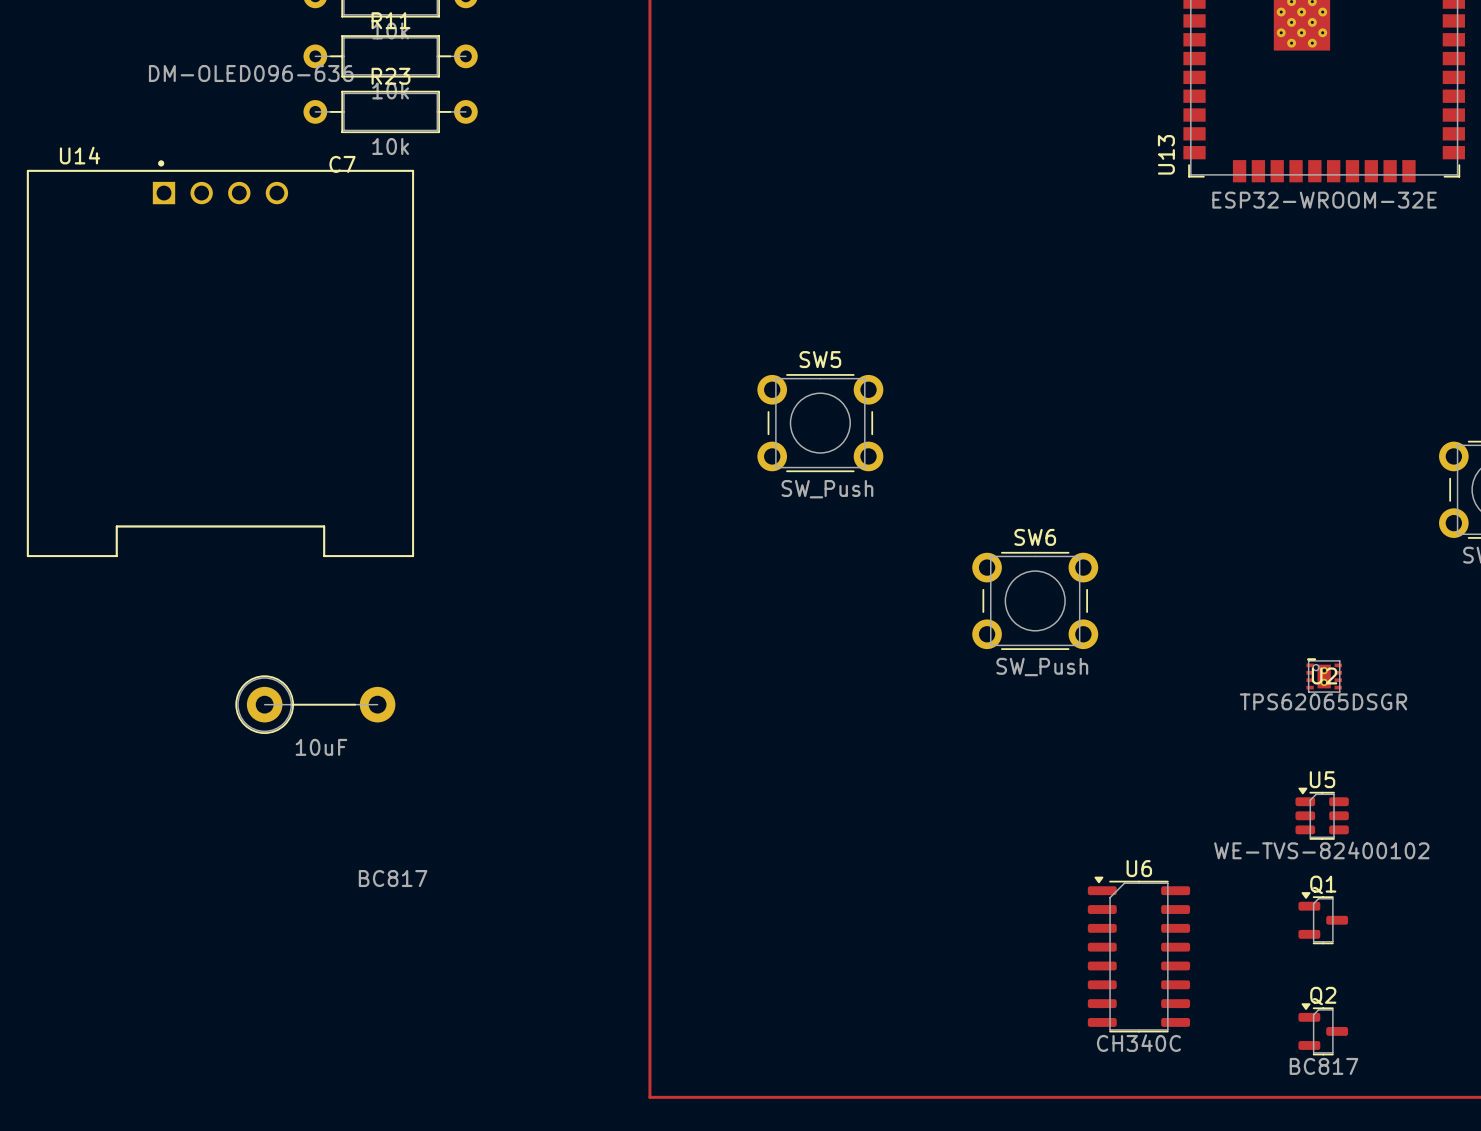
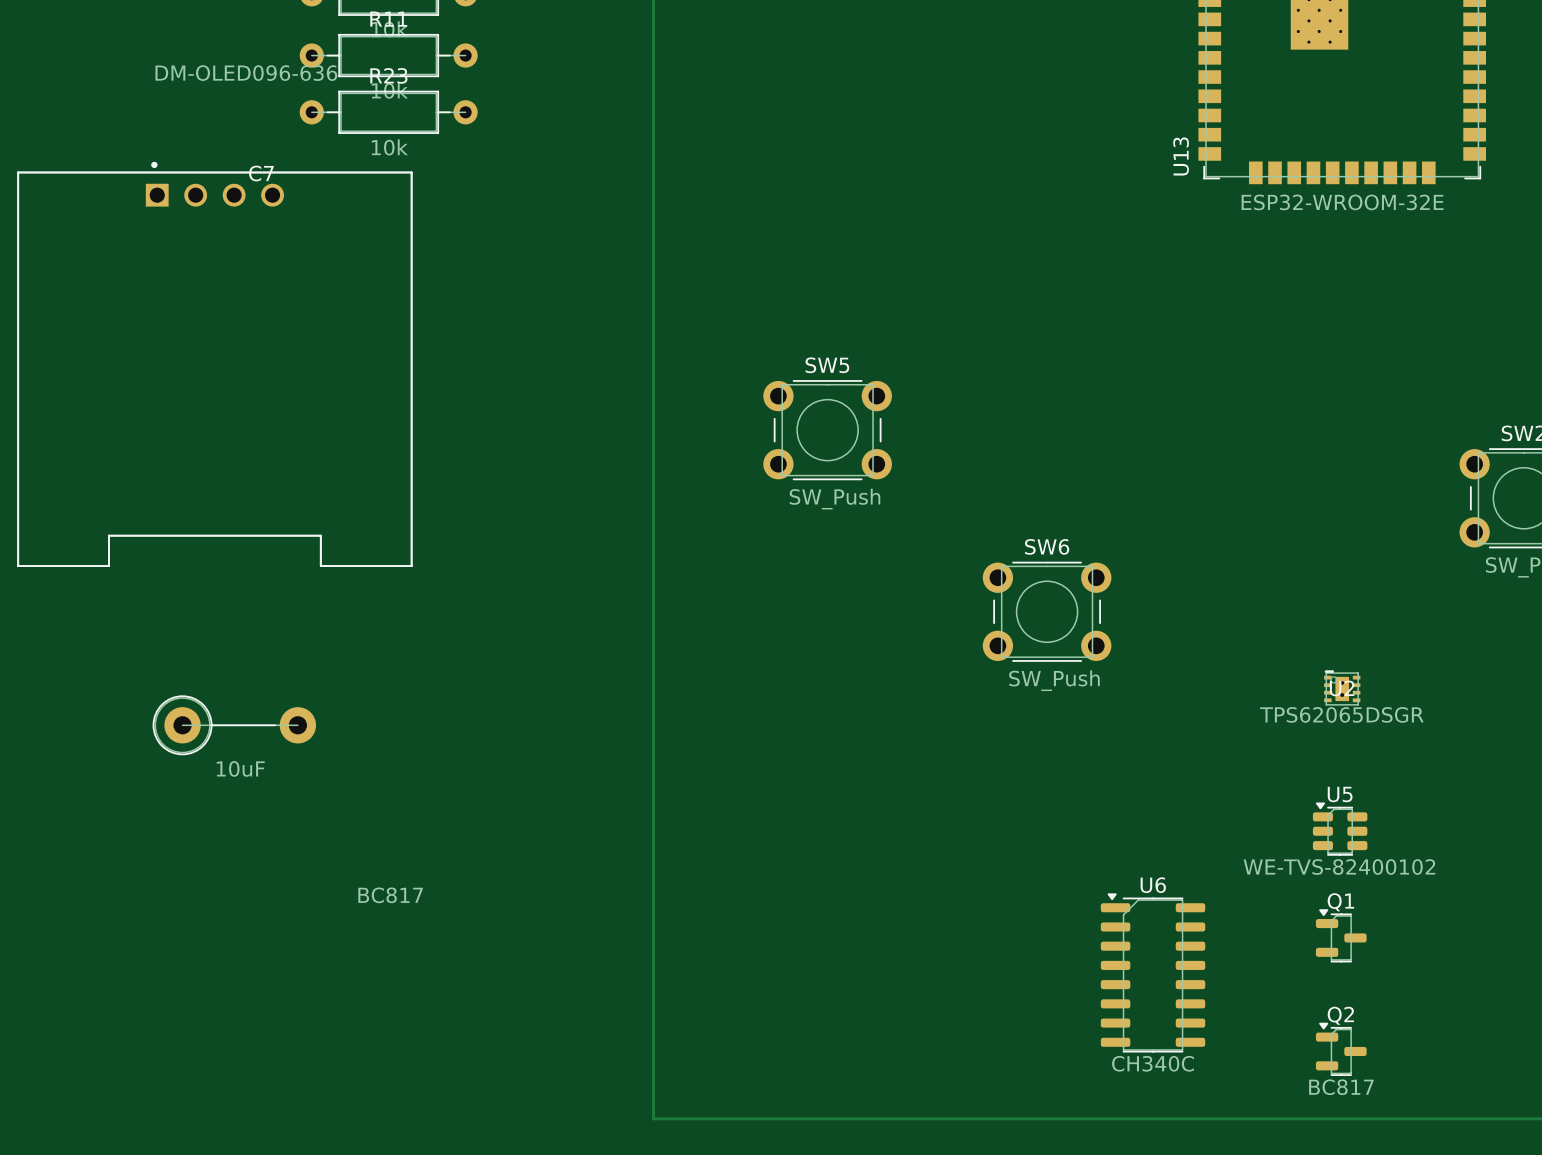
U14 name: U14 (80, 155) -> none
C7 position: (315, 704) -> (234, 725)

